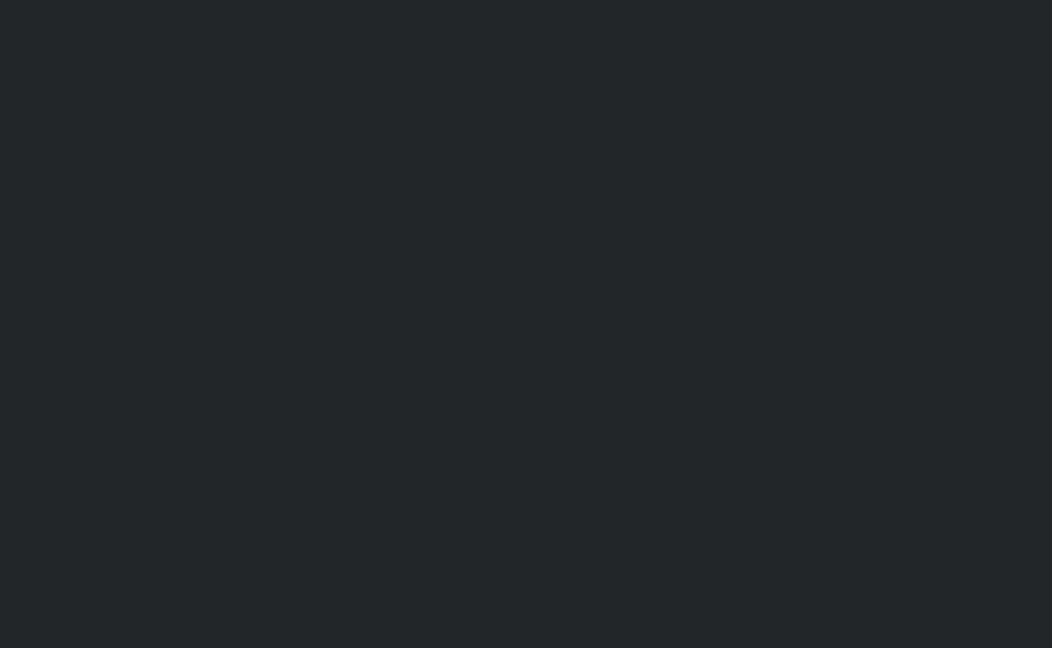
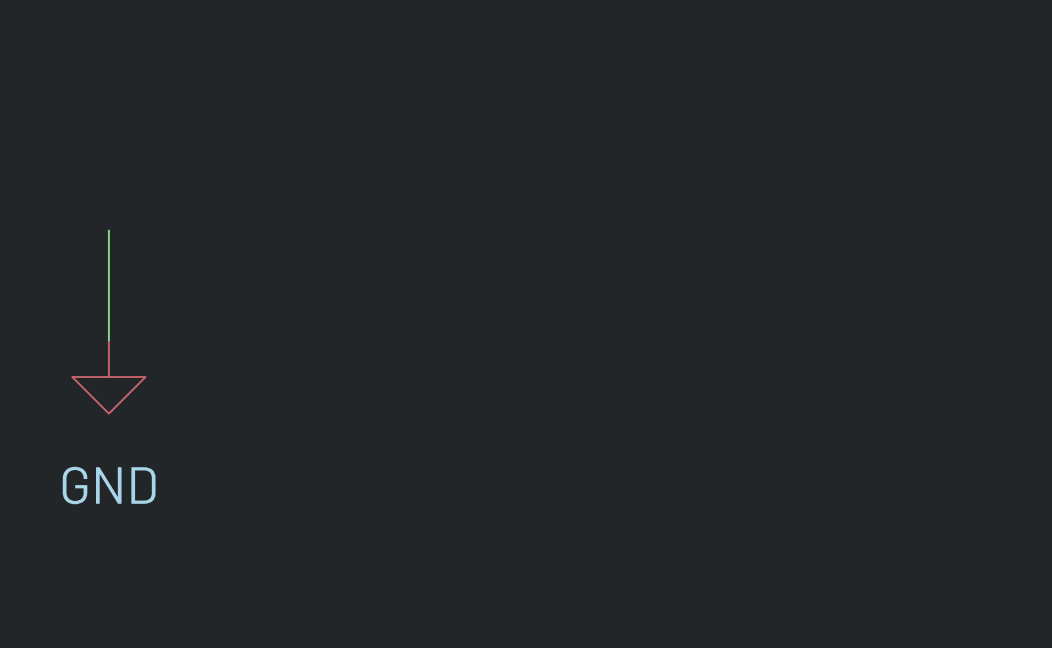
wire: none -> (108, 230) (108, 340)
power symbol: none -> GND (108, 377)

